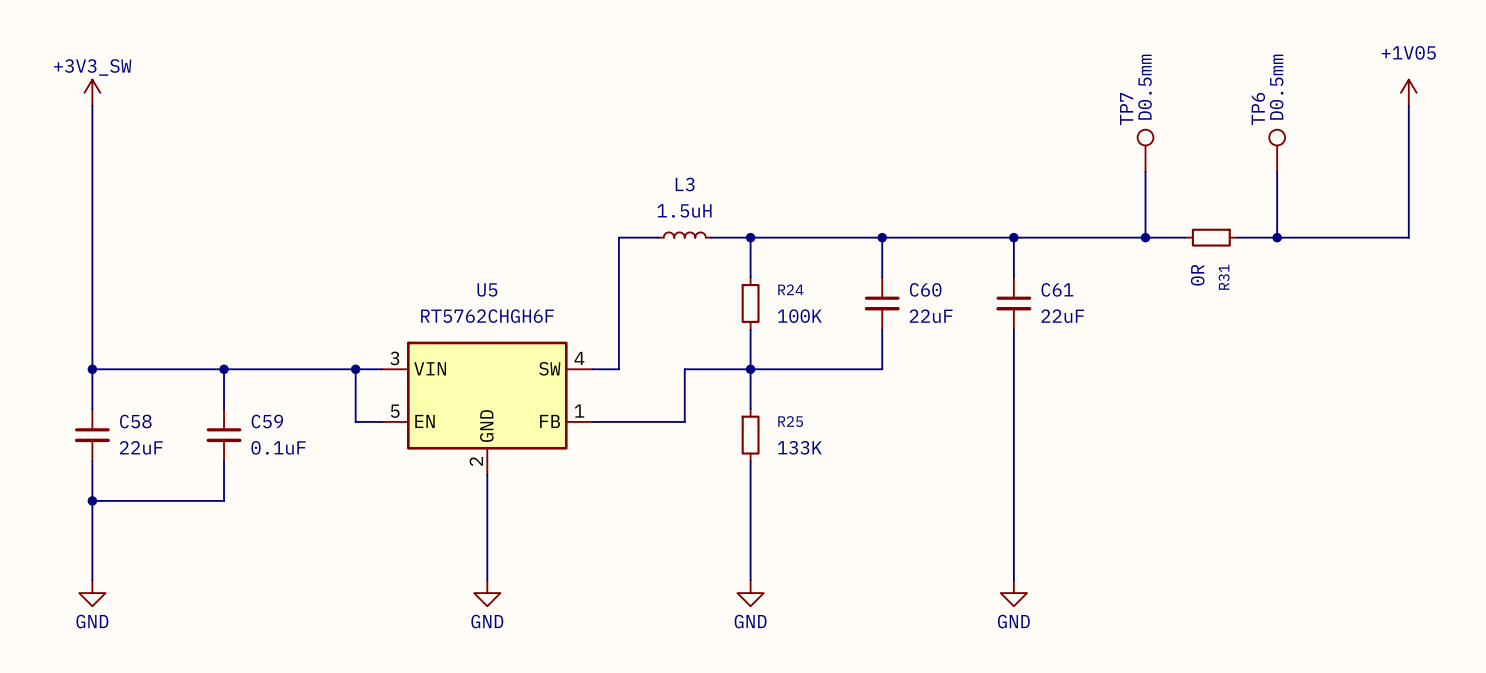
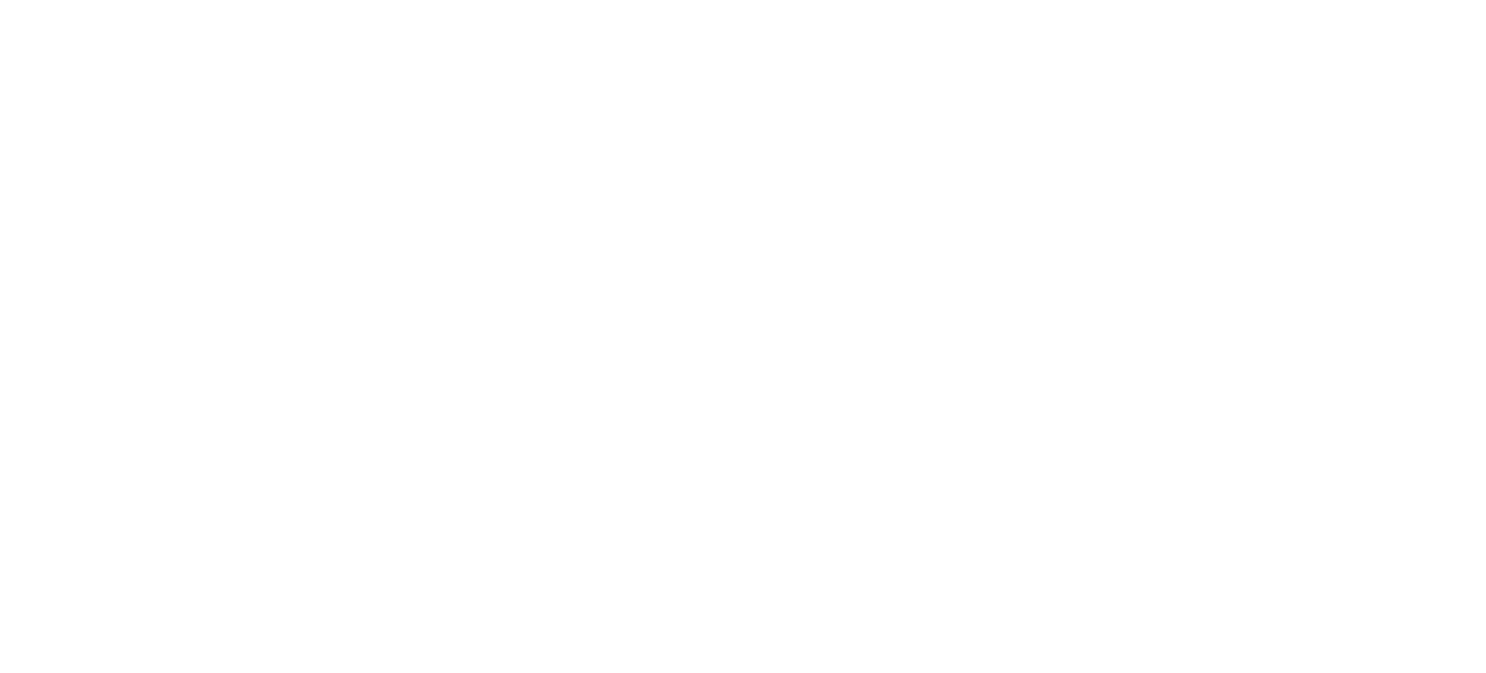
power symbol: +3V3_SW (92, 92) -> none
power symbol: +1V05 (1408, 92) -> none
wire: (92, 106) (92, 408) -> none
wire: (1408, 106) (1408, 237) (1237, 237) -> none
TP7: D0.5mm (1145, 150) -> none
TP6: D0.5mm (1277, 150) -> none
wire: (1145, 171) (1145, 237) -> none
wire: (1277, 171) (1277, 237) -> none
L3: 1.5uH (684, 235) -> none
wire: (658, 237) (618, 237) (618, 369) (592, 369) -> none
wire: (711, 237) (1185, 237) -> none
wire: (750, 237) (750, 277) -> none
junction: (750, 237) -> none
wire: (882, 237) (882, 277) -> none
junction: (882, 237) -> none
wire: (1013, 237) (1013, 277) -> none
junction: (1013, 237) -> none
junction: (1145, 237) -> none
R31: 0R (1211, 237) -> none
junction: (1277, 237) -> none
R24: 100K (750, 303) -> none
C60: 22uF (882, 303) -> none
C61: 22uF (1013, 303) -> none
wire: (750, 329) (750, 408) -> none
wire: (882, 329) (882, 369) (684, 369) (684, 421) (592, 421) -> none
wire: (1013, 329) (1013, 579) -> none
wire: (92, 369) (381, 369) -> none
junction: (92, 369) -> none
wire: (224, 369) (224, 408) -> none
junction: (224, 369) -> none
wire: (355, 369) (355, 421) (381, 421) -> none
junction: (355, 369) -> none
junction: (750, 369) -> none
U5: RT5762CHGH6F (487, 408) -> none
C58: 22uF (92, 435) -> none
C59: 0.1uF (224, 435) -> none
R25: 133K (750, 435) -> none
wire: (92, 461) (92, 579) -> none
wire: (224, 461) (224, 500) (92, 500) -> none
wire: (750, 461) (750, 579) -> none
wire: (487, 474) (487, 579) -> none
junction: (92, 500) -> none
power symbol: GND (92, 593) -> none
power symbol: GND (487, 593) -> none
power symbol: GND (750, 593) -> none
power symbol: GND (1013, 593) -> none

